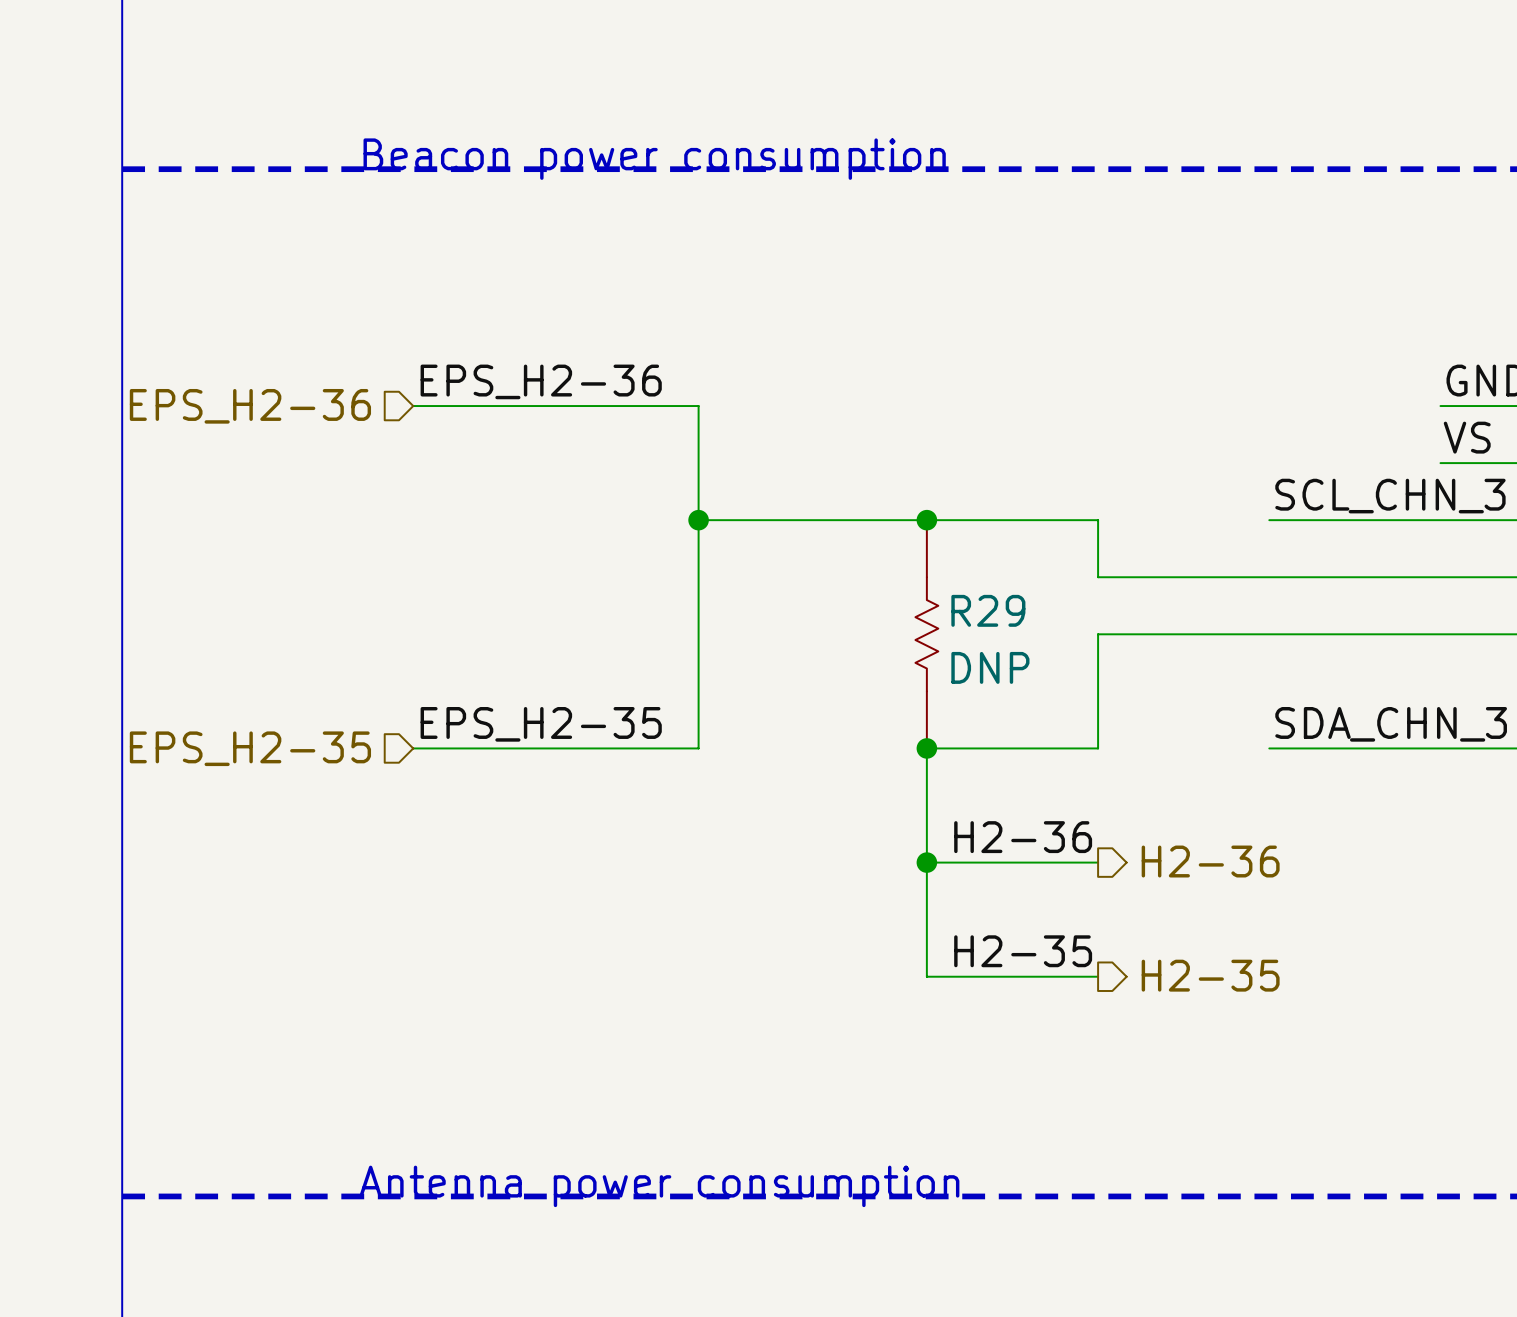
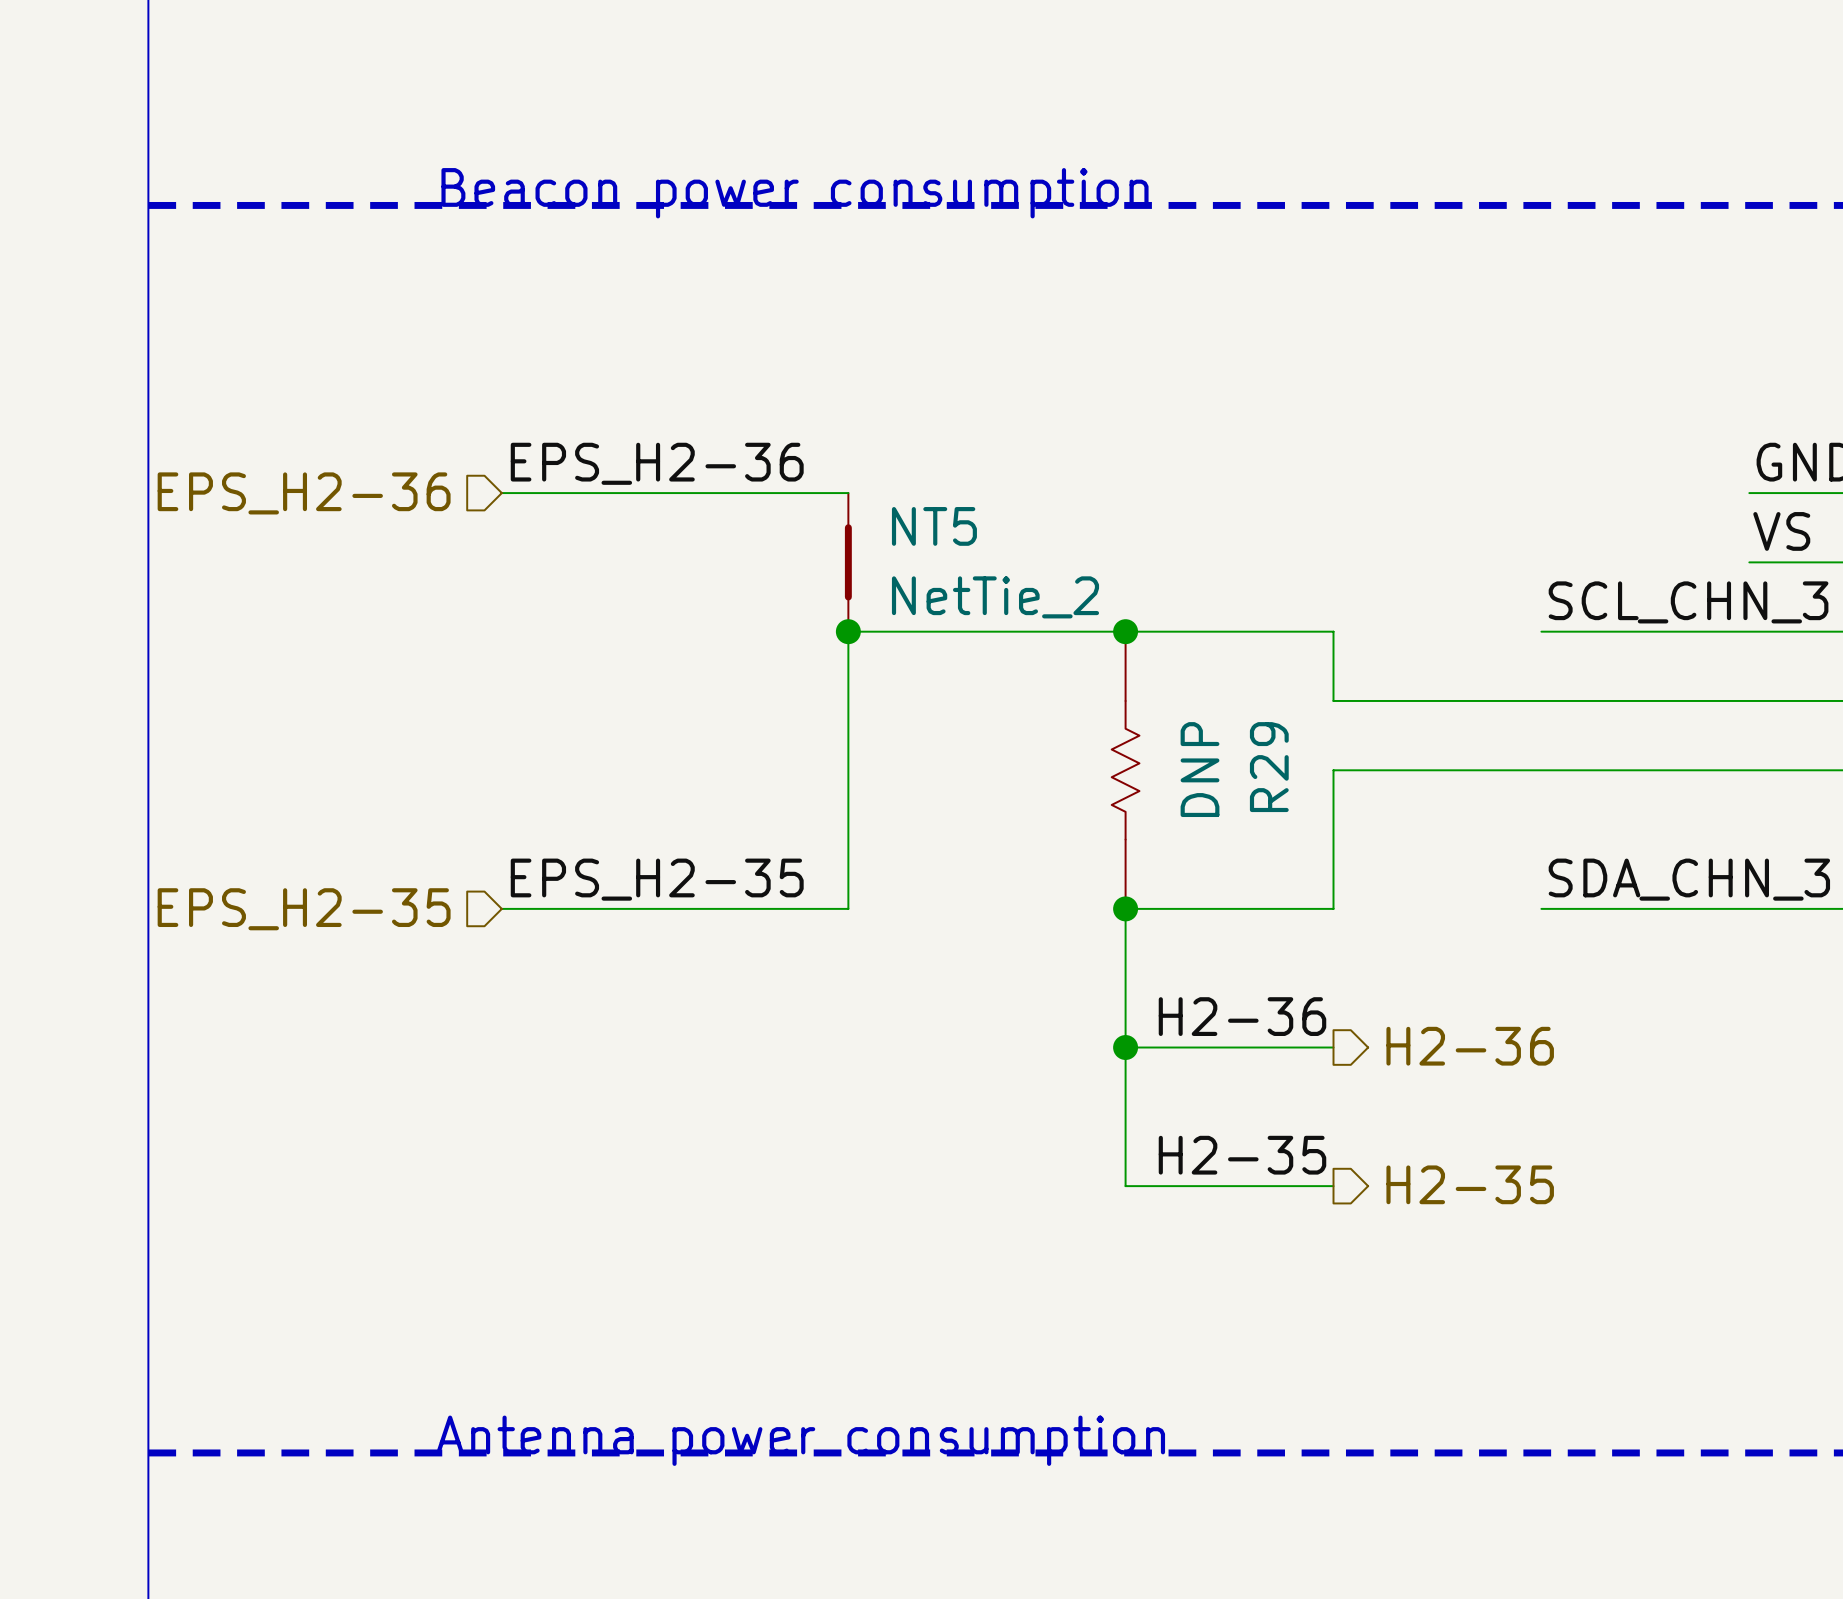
NT5: none -> NetTie_2 (848, 562)
R29 name rotation: 0° (988, 610) -> 90° counterclockwise (1269, 767)
R29 value rotation: 0° (990, 667) -> 90° counterclockwise (1200, 769)

